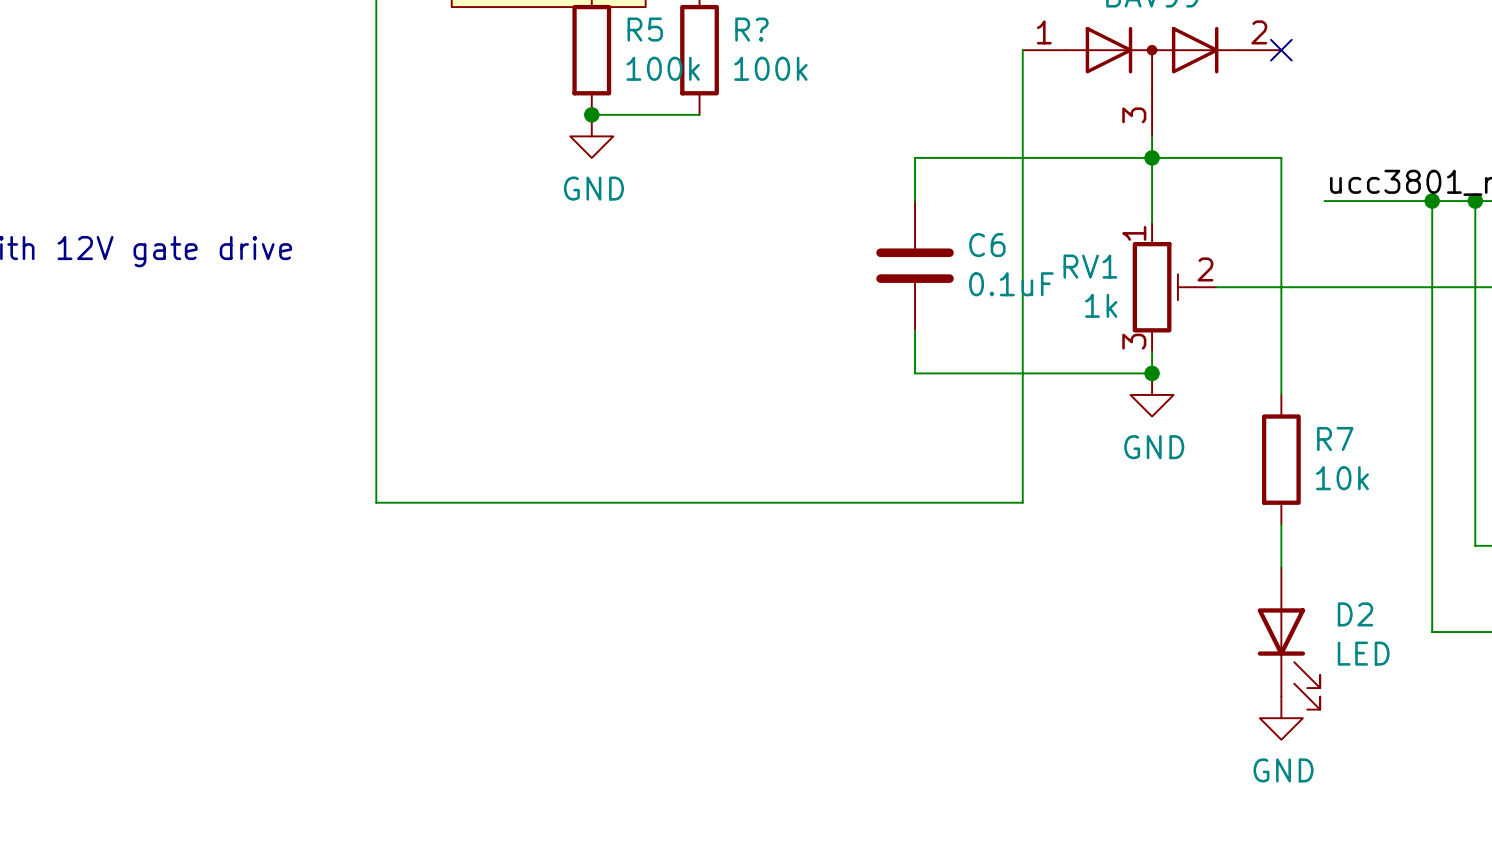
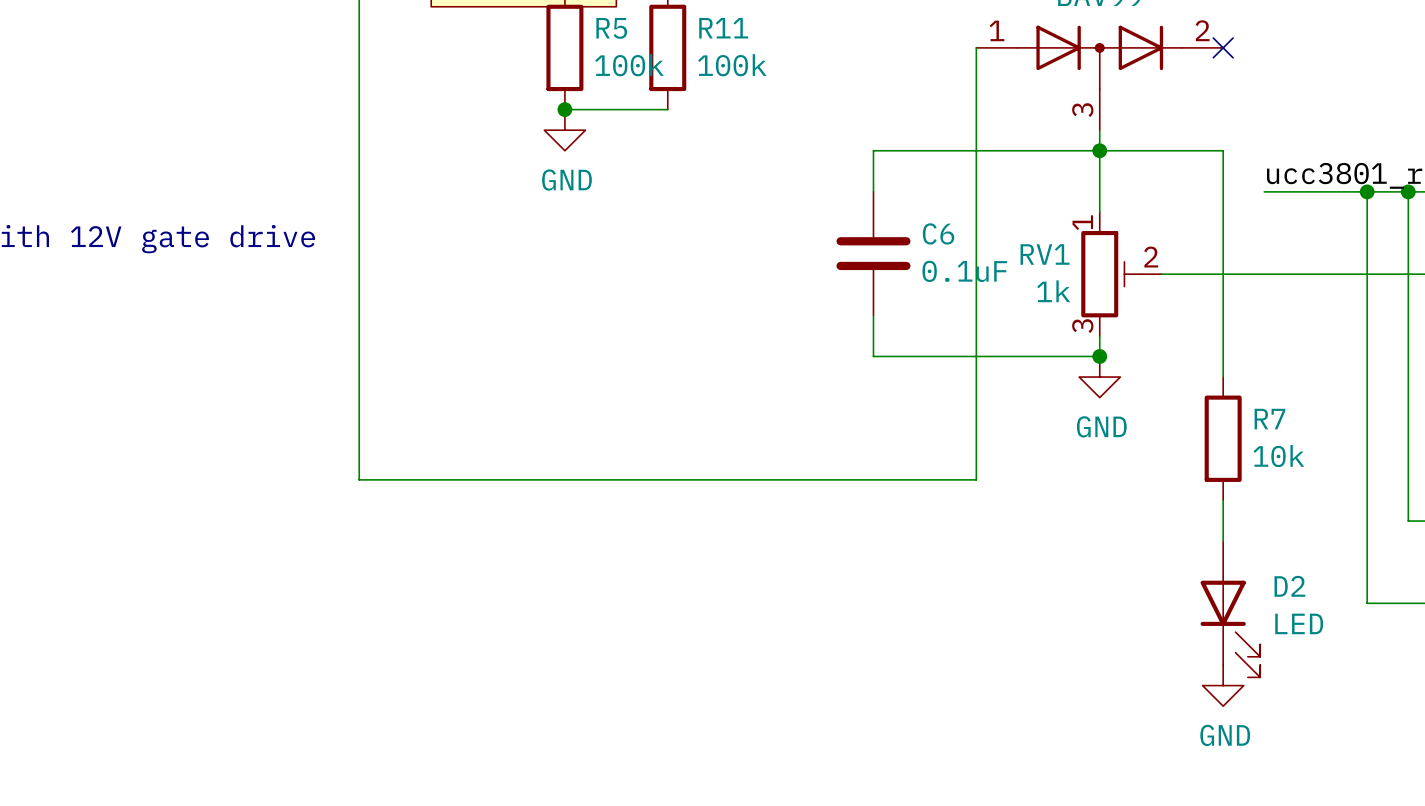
R? name: R? (751, 29) -> R11 (723, 28)

